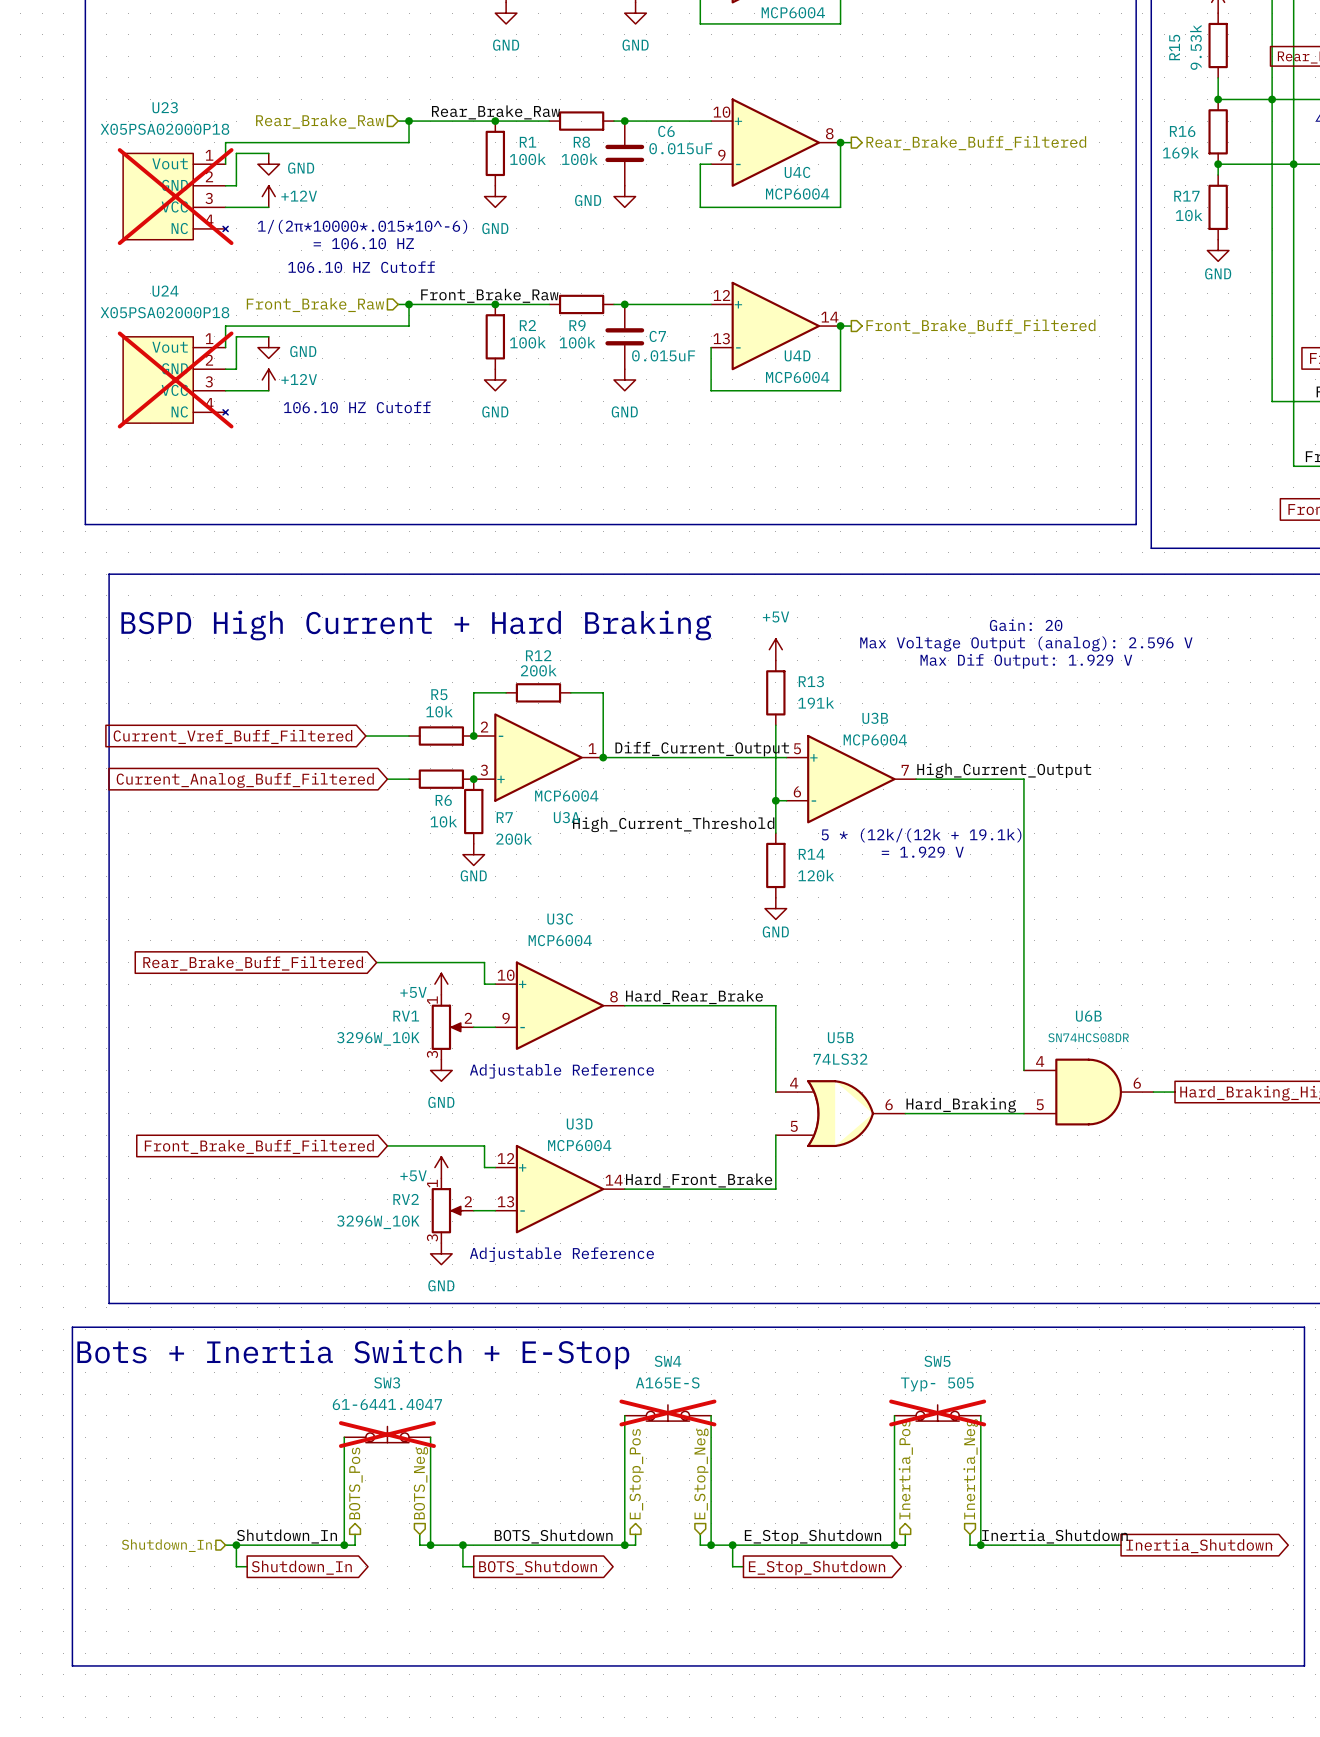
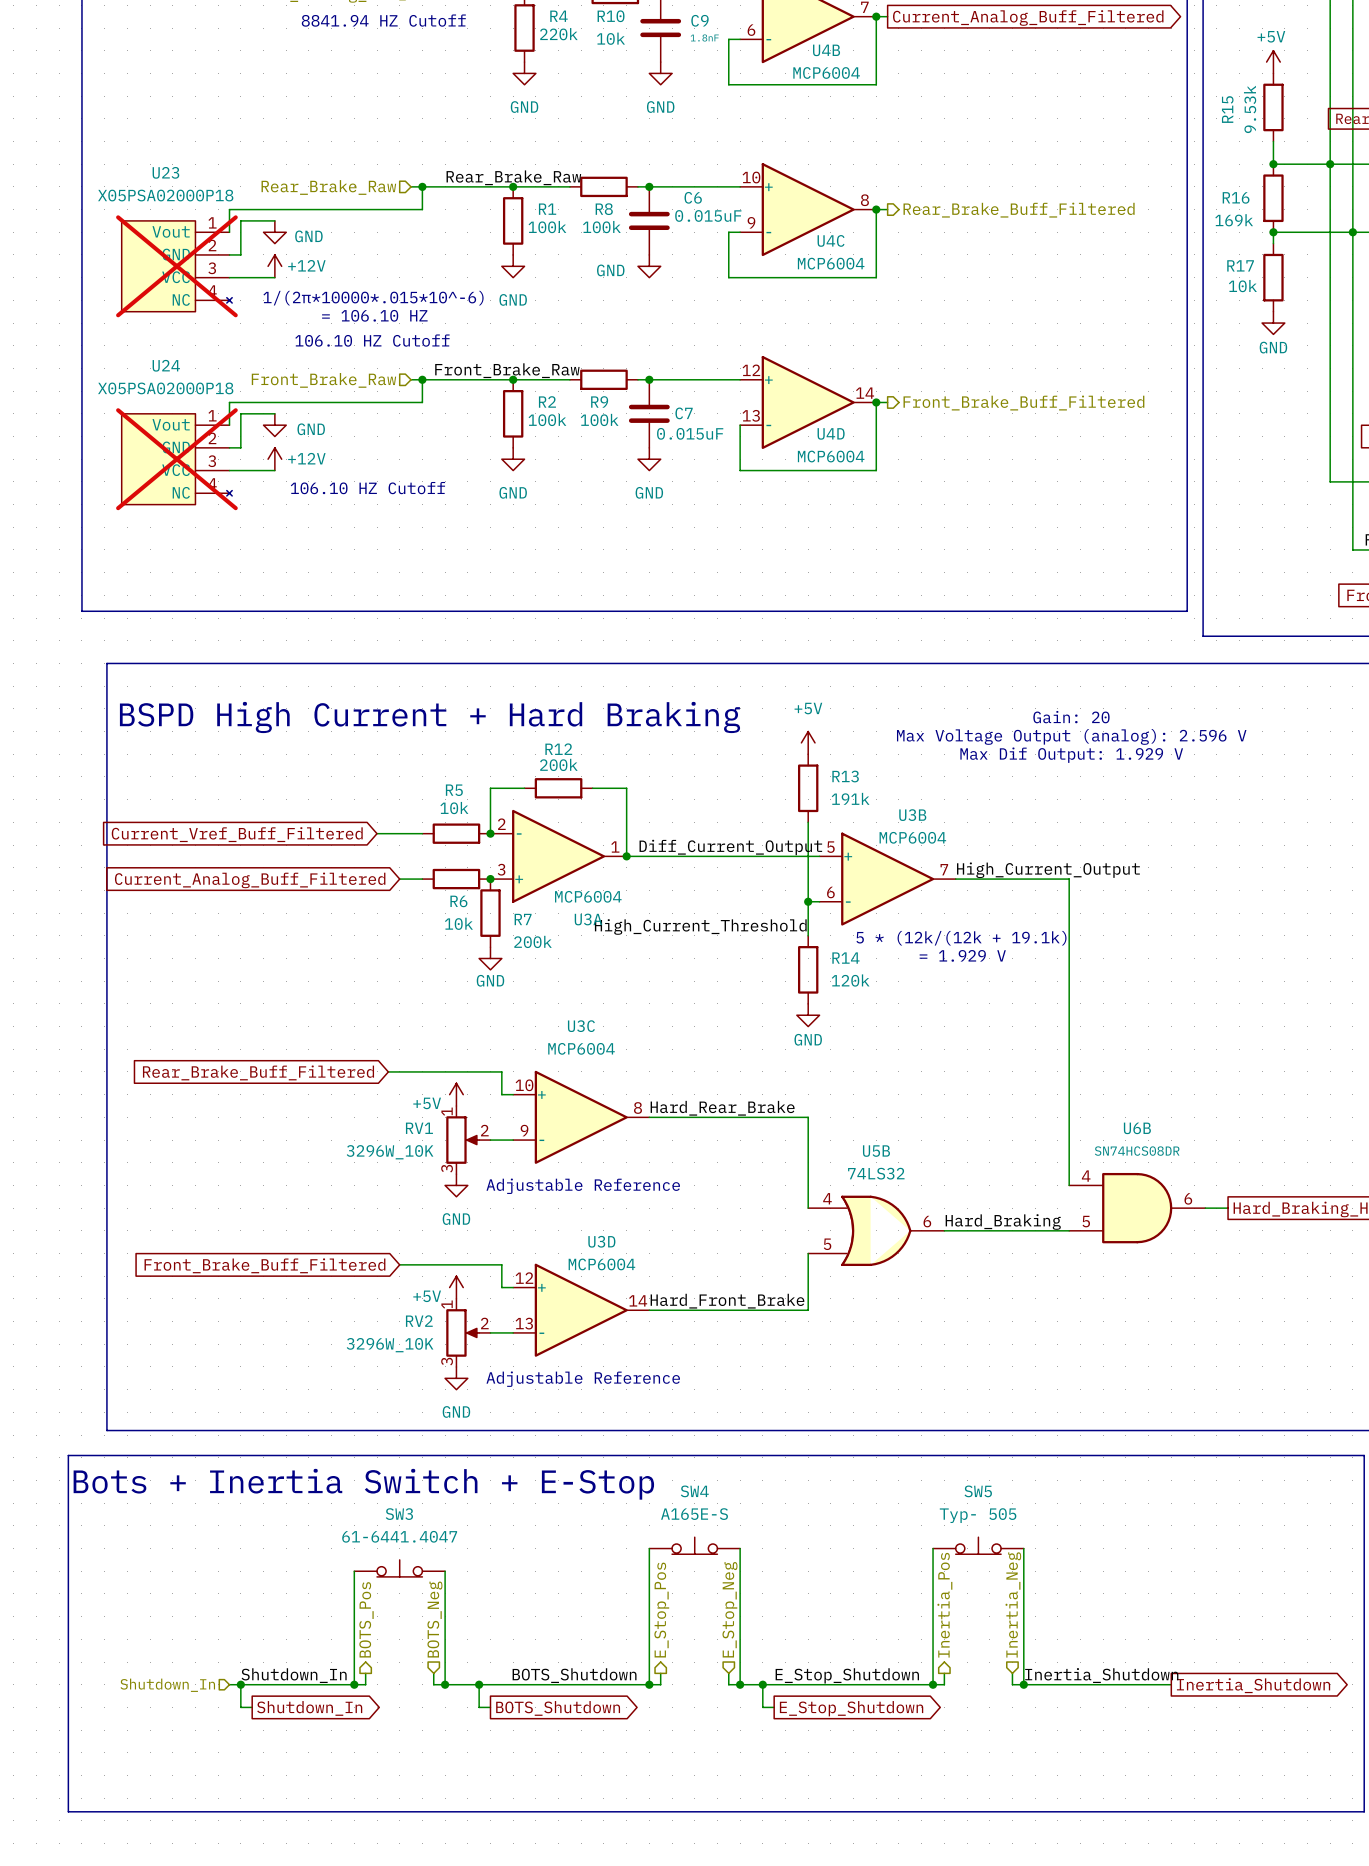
SW4 do-not-place cross: (667, 1412) -> none
SW5 do-not-place cross: (937, 1412) -> none
SW3 do-not-place cross: (387, 1434) -> none

